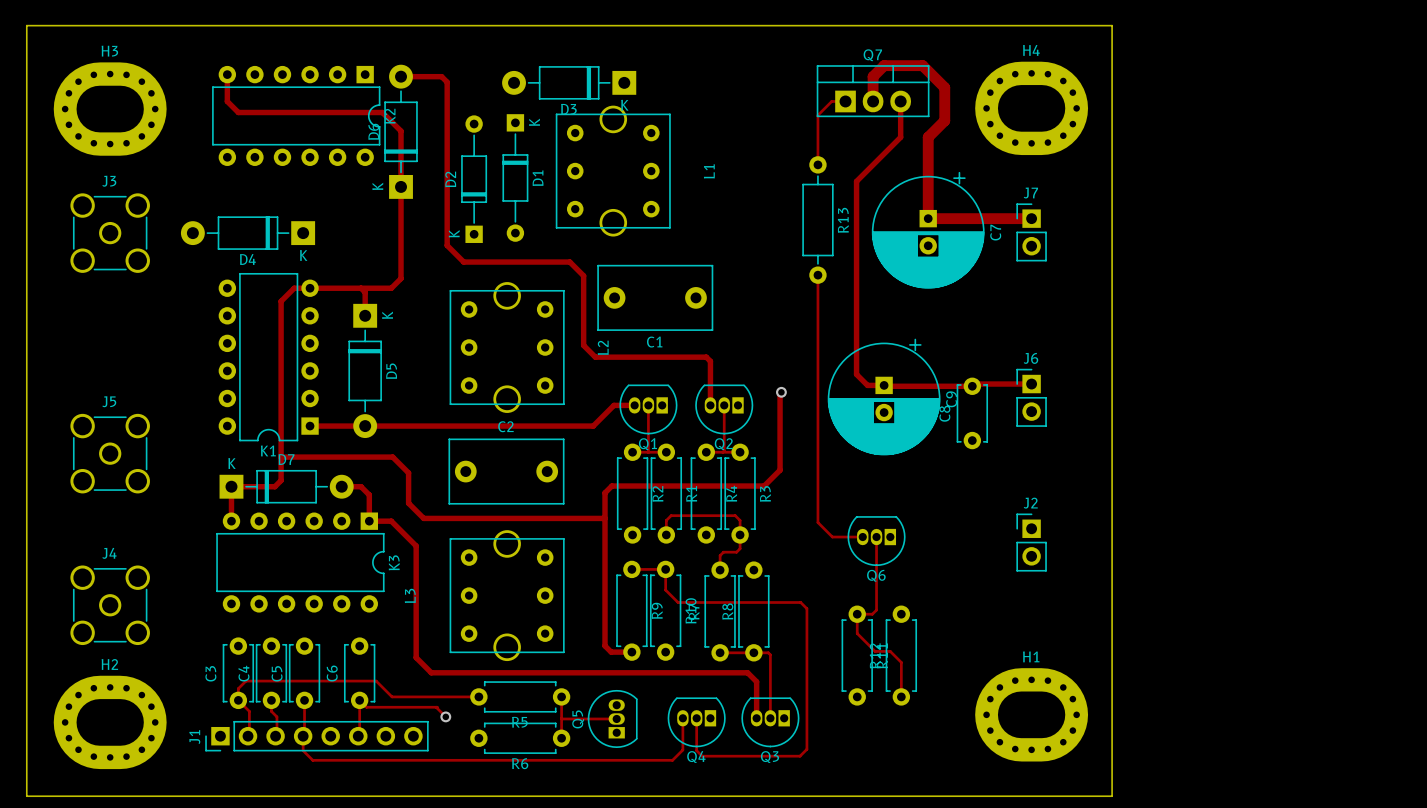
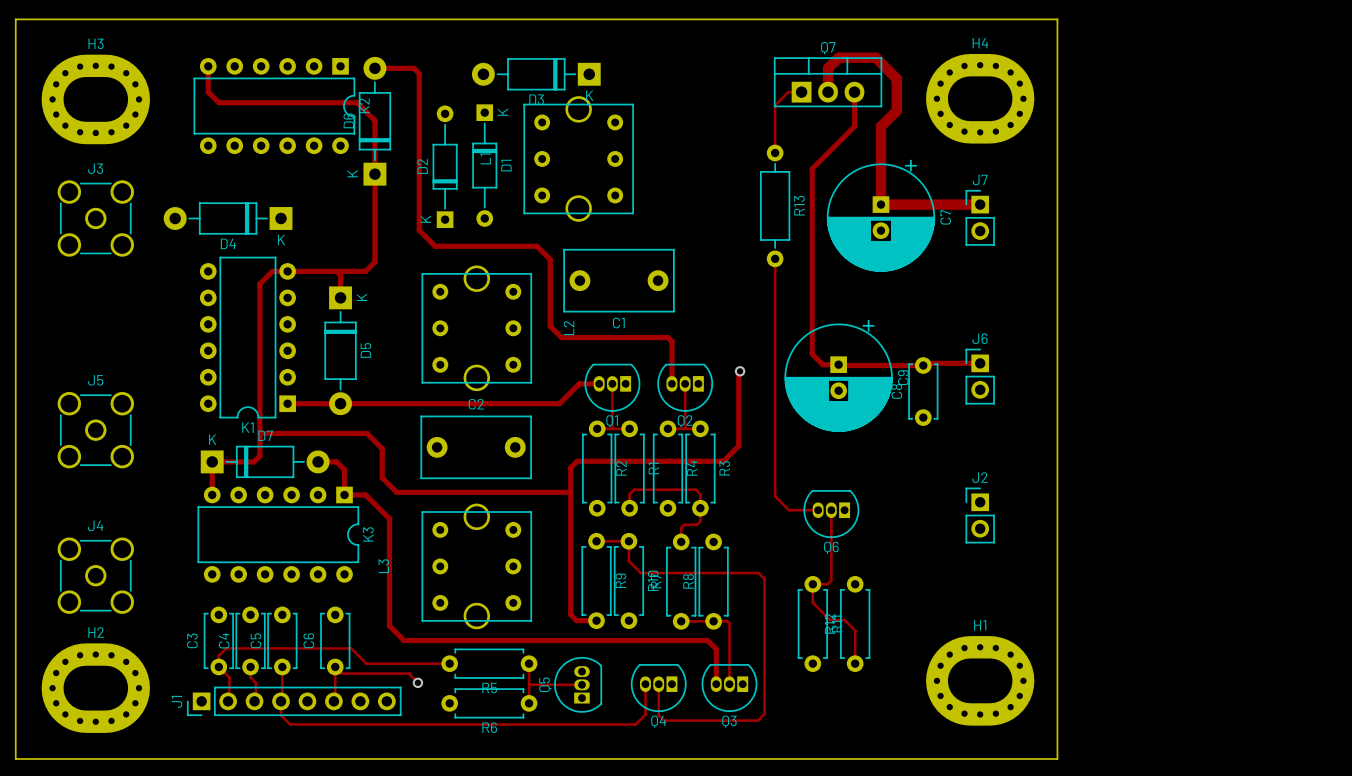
L1 name position: L1 (709, 171) -> L1 (485, 158)

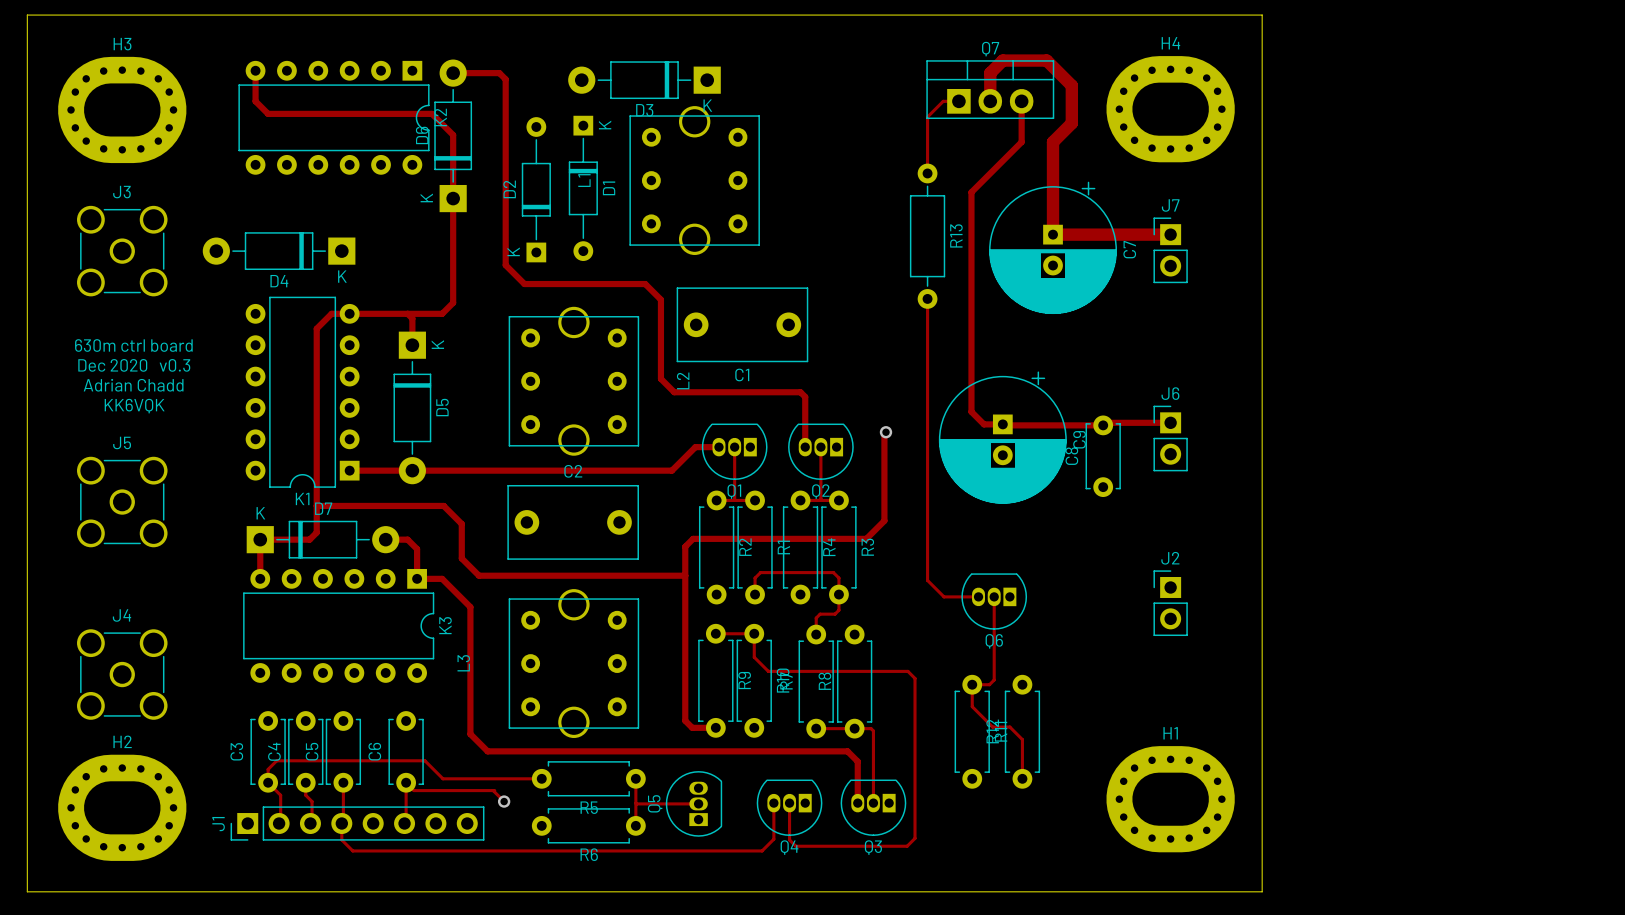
text: none -> 630m ctrl board (133, 345)
text: none -> Dec 2020 v0.3 (134, 365)
text: none -> Adrian Chadd (133, 385)
text: none -> KK6VQK (134, 406)

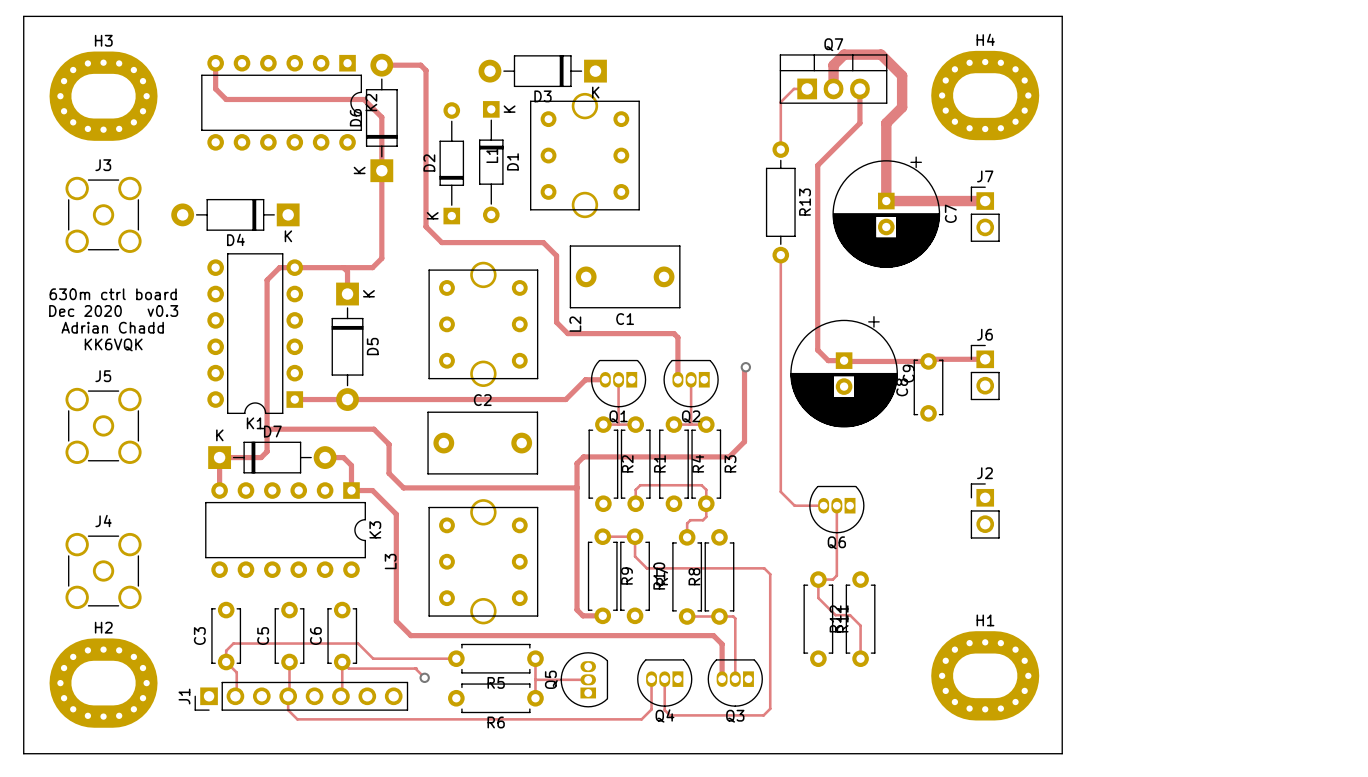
C4: (305, 751) -> none
track: (305, 782) (305, 795) (312, 801) (312, 821) -> none

